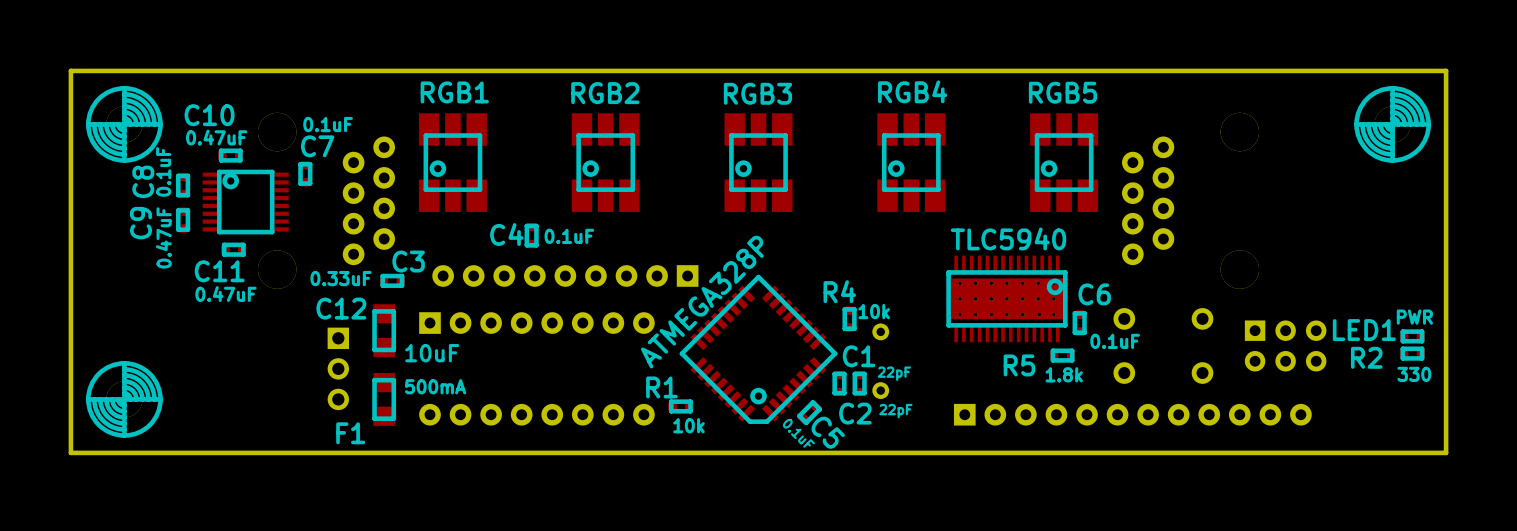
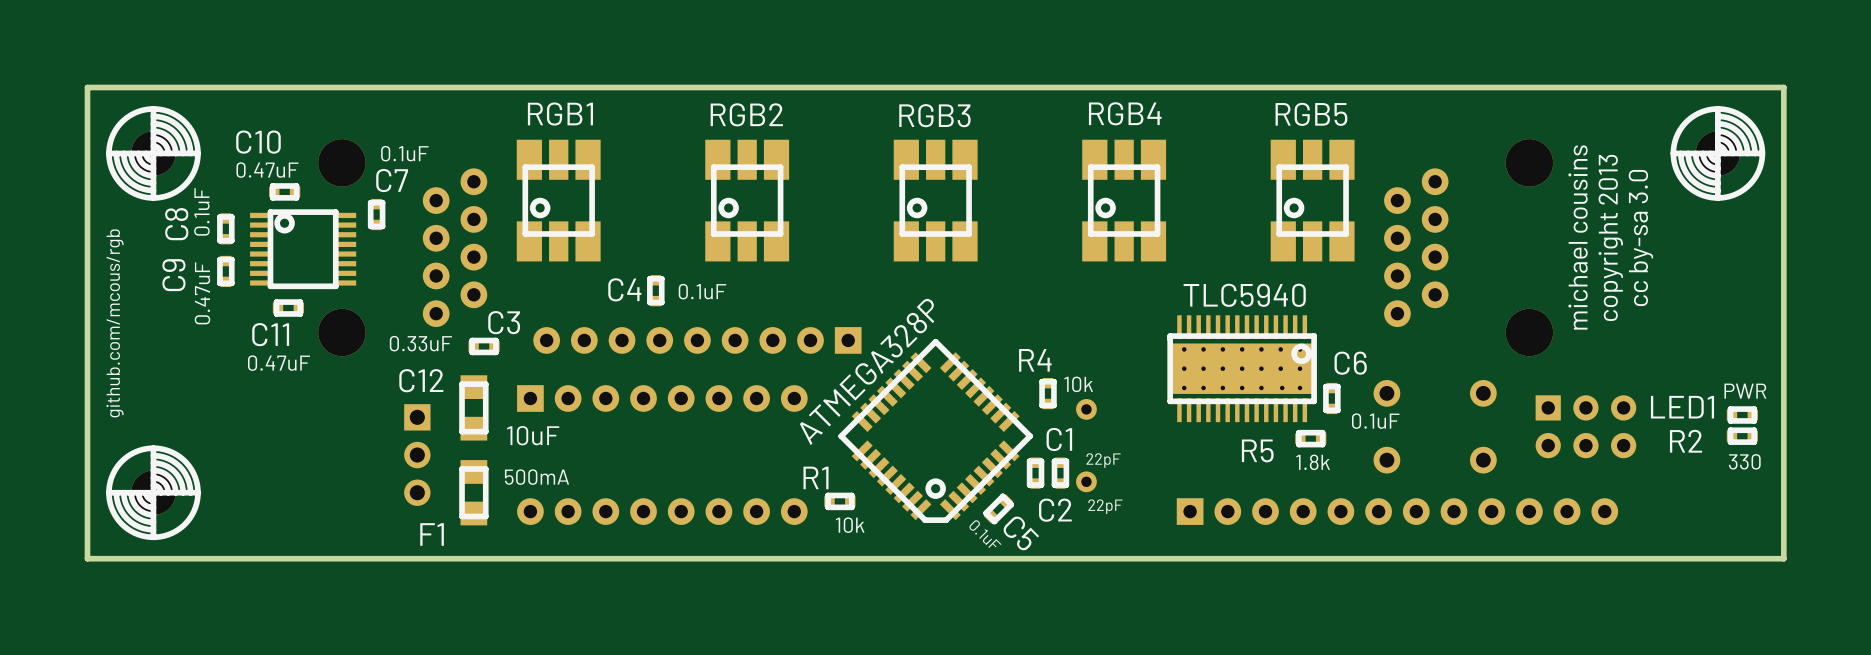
text: none -> michael cousins (1578, 237)
text: none -> copyright 2013 (1610, 237)
text: none -> cc by-sa 3.0 (1640, 238)
text: none -> github.com/mcous/rgb (115, 323)

